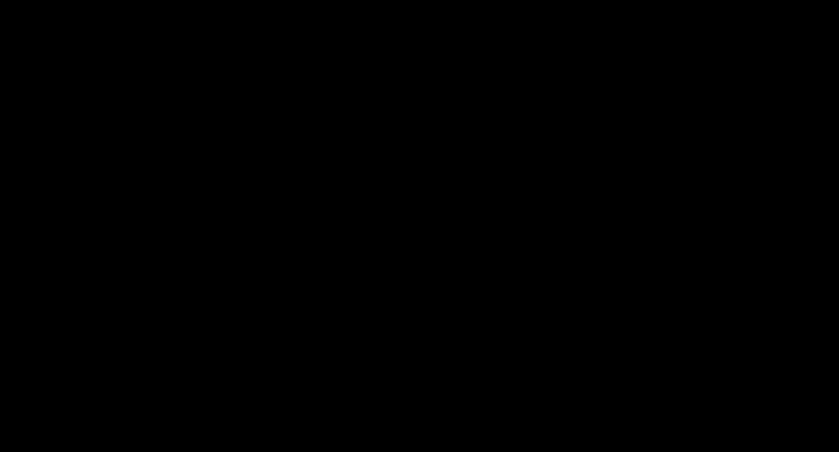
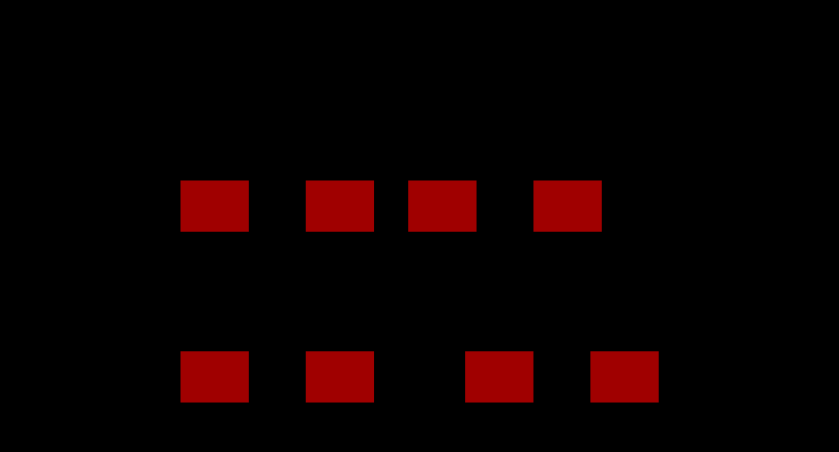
part: none -> (277, 206)
part: none -> (504, 206)
part: none -> (277, 376)
part: none -> (561, 376)

